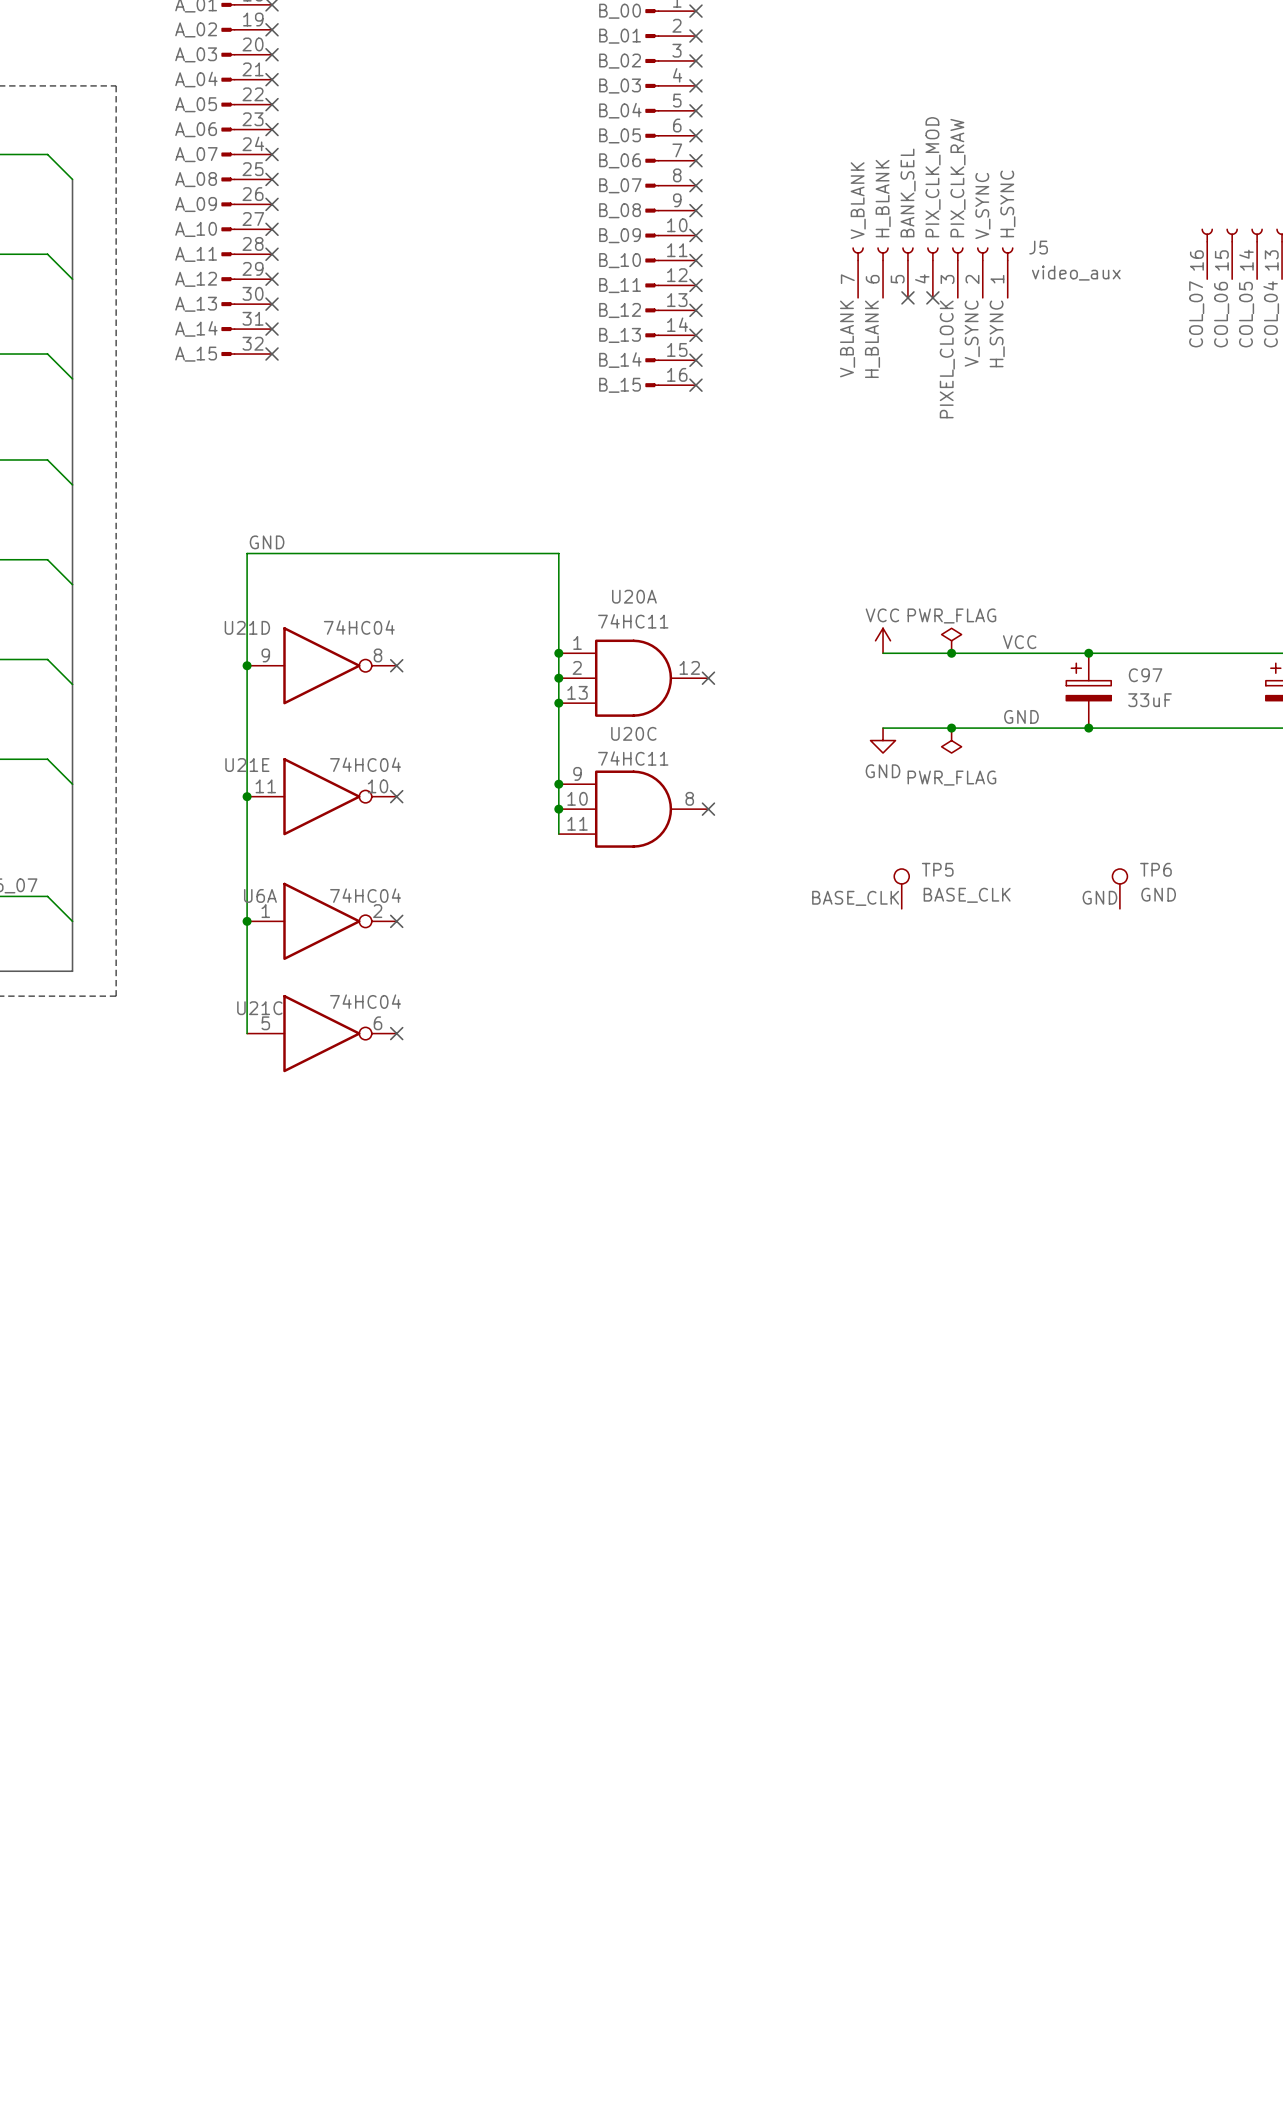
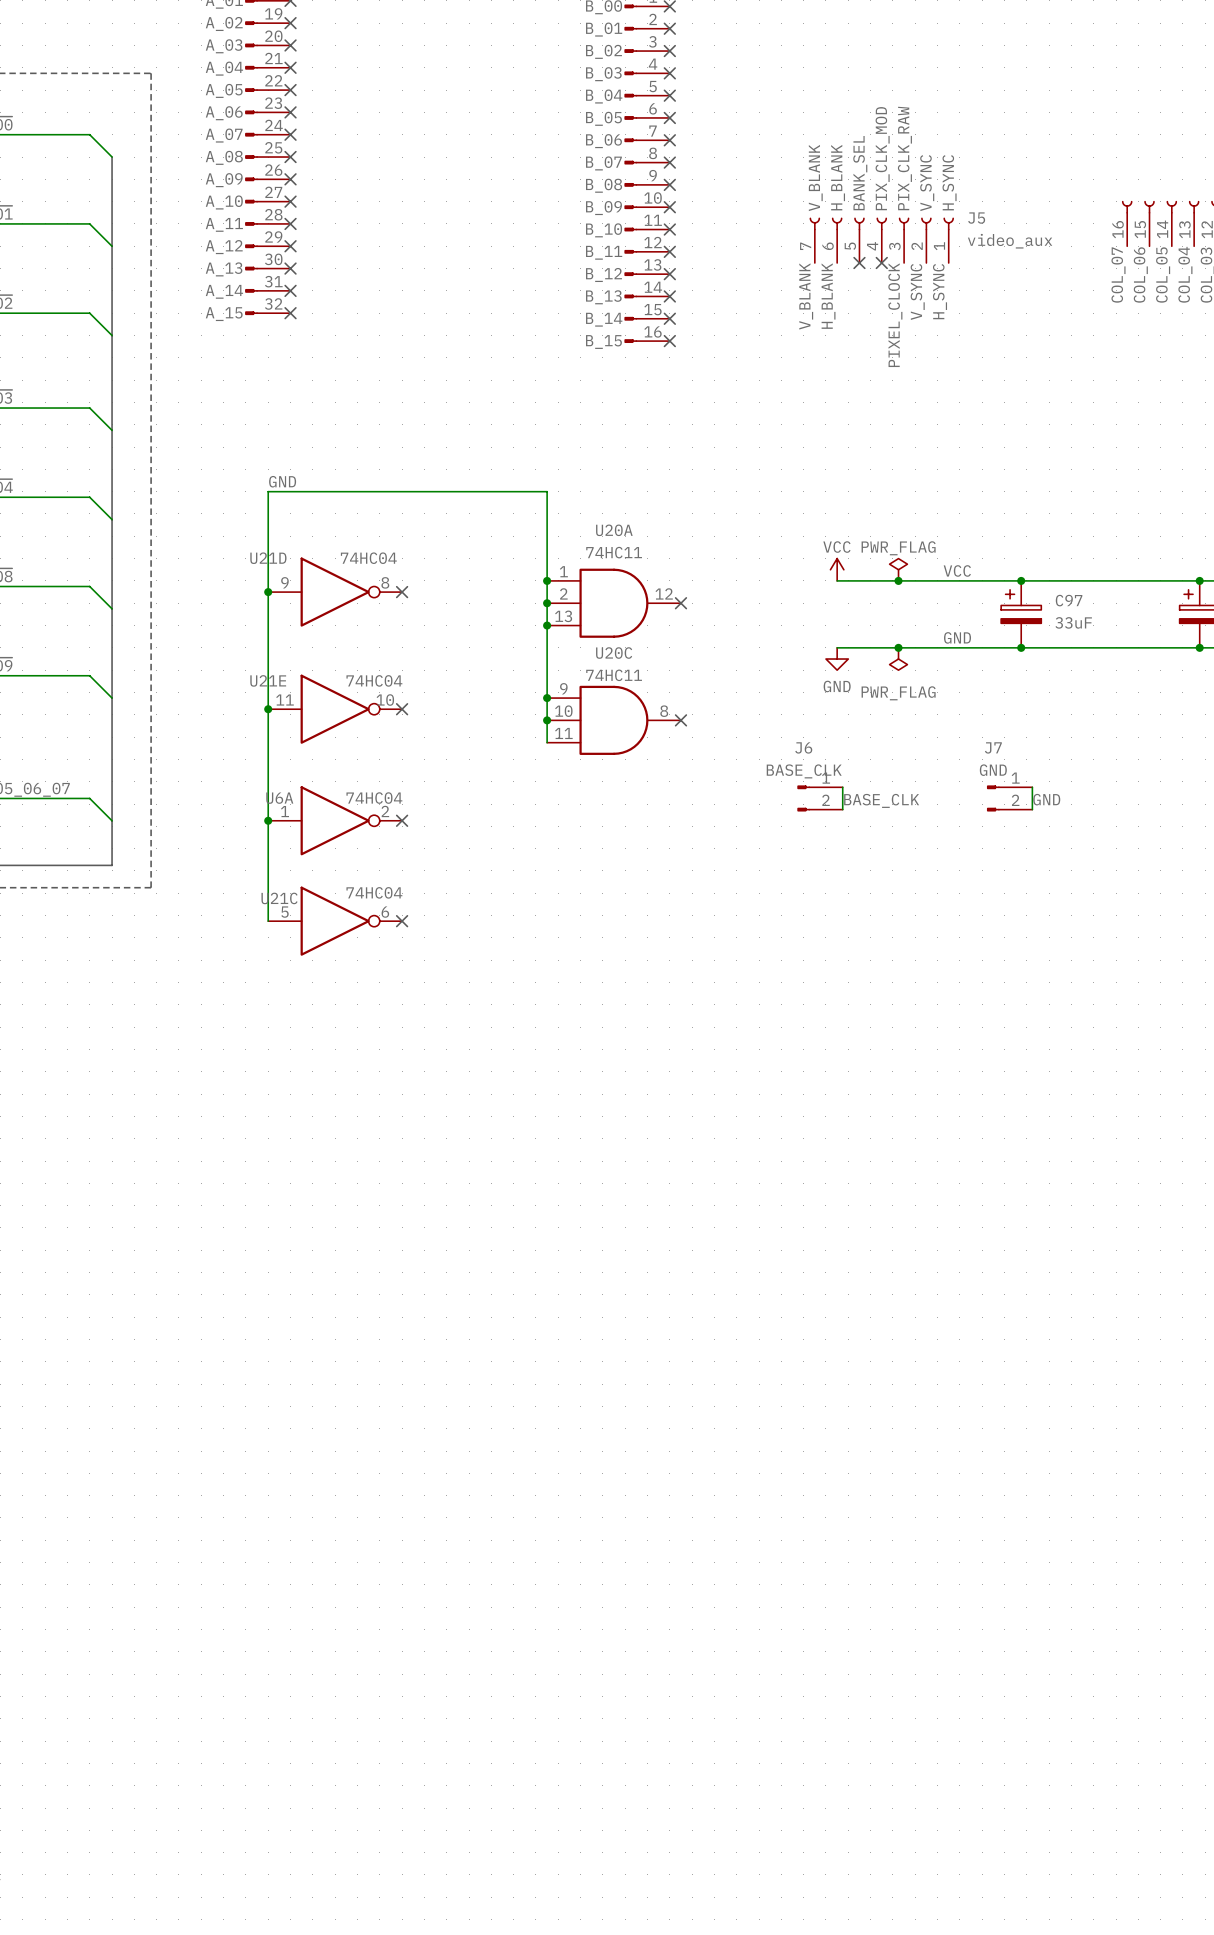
wire: none -> (842, 787) (842, 809)
wire: none -> (1032, 787) (1032, 809)
TP5: BASE_CLK (901, 888) -> none
TP6: GND (1119, 888) -> none
J6: none -> BASE_CLK (820, 798)
J7: none -> GND (1009, 798)
label position: GND (1099, 897) -> GND (1046, 799)
label position: BASE_CLK (855, 898) -> BASE_CLK (881, 800)

